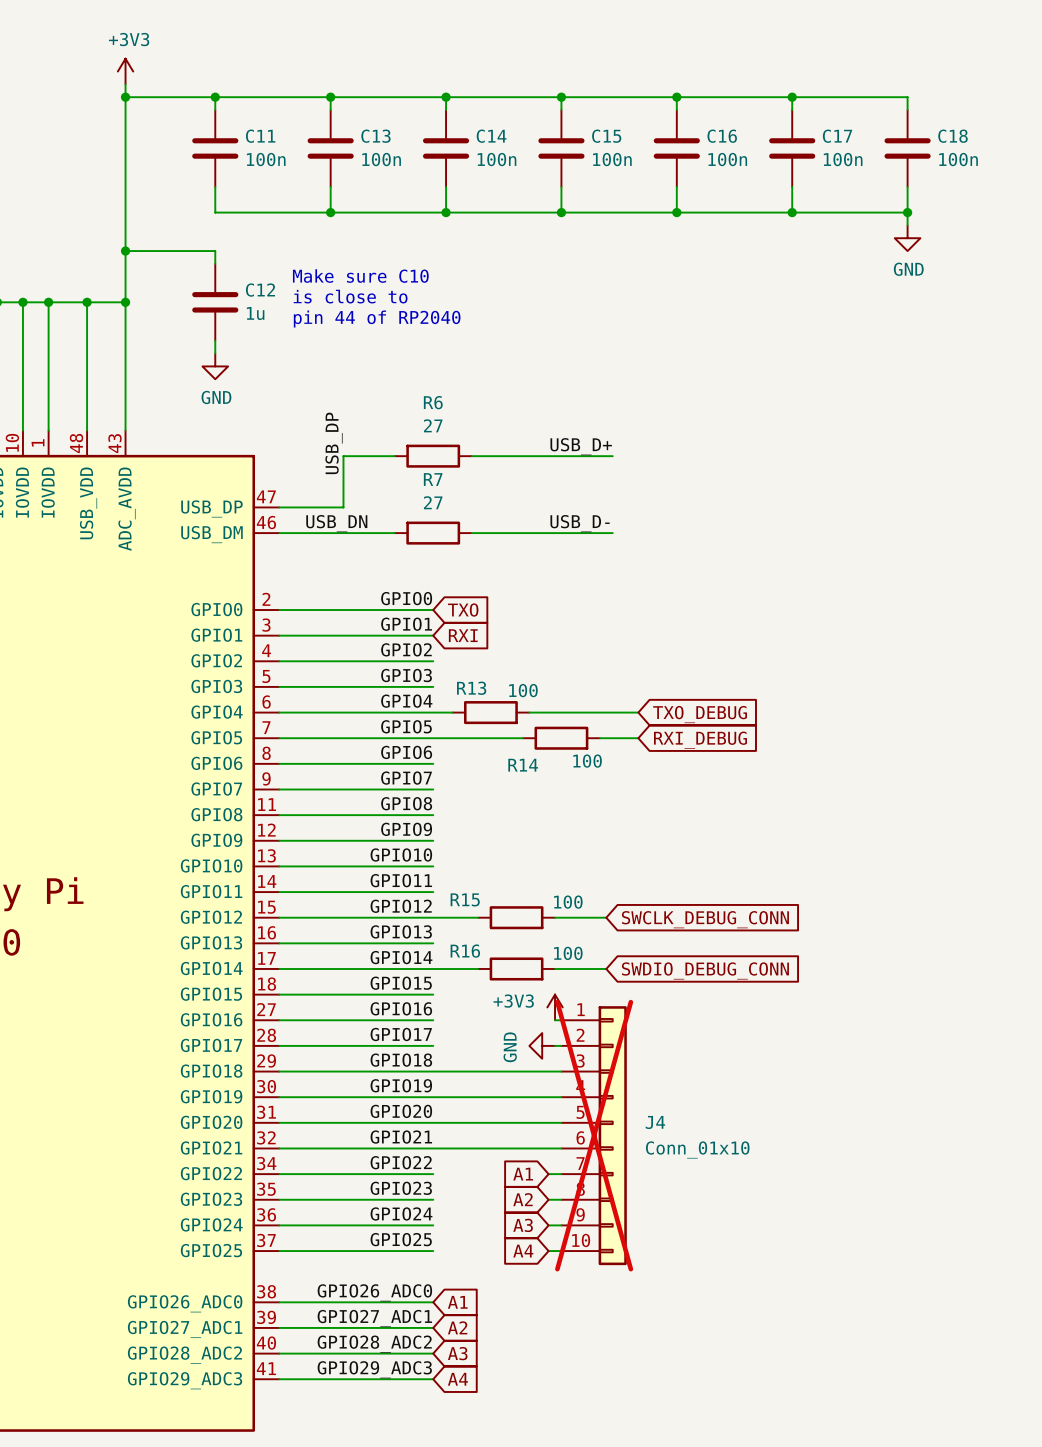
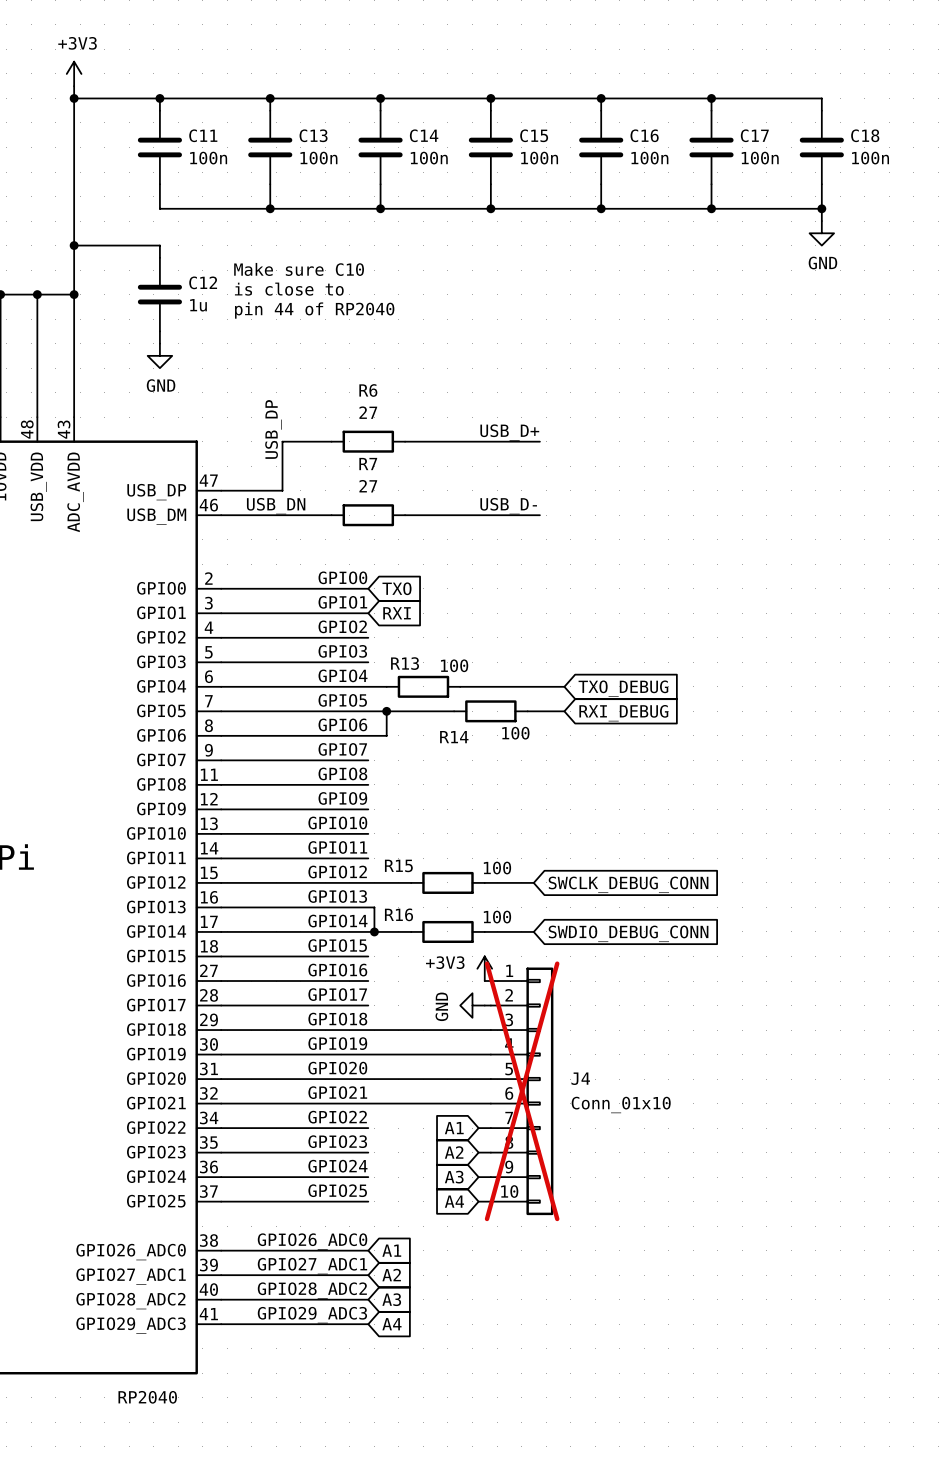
wire: none -> (386, 711) (386, 735) (368, 735)
junction: none -> (386, 711)
wire: none -> (368, 907) (374, 907) (374, 931)
junction: none -> (374, 931)

